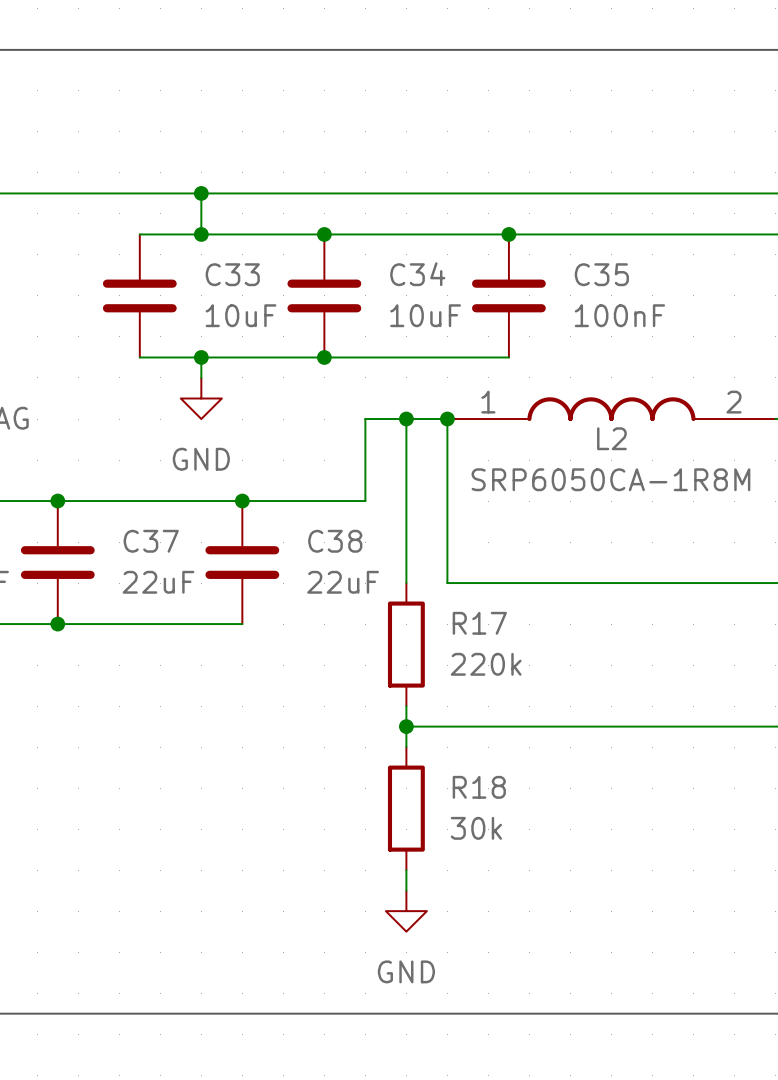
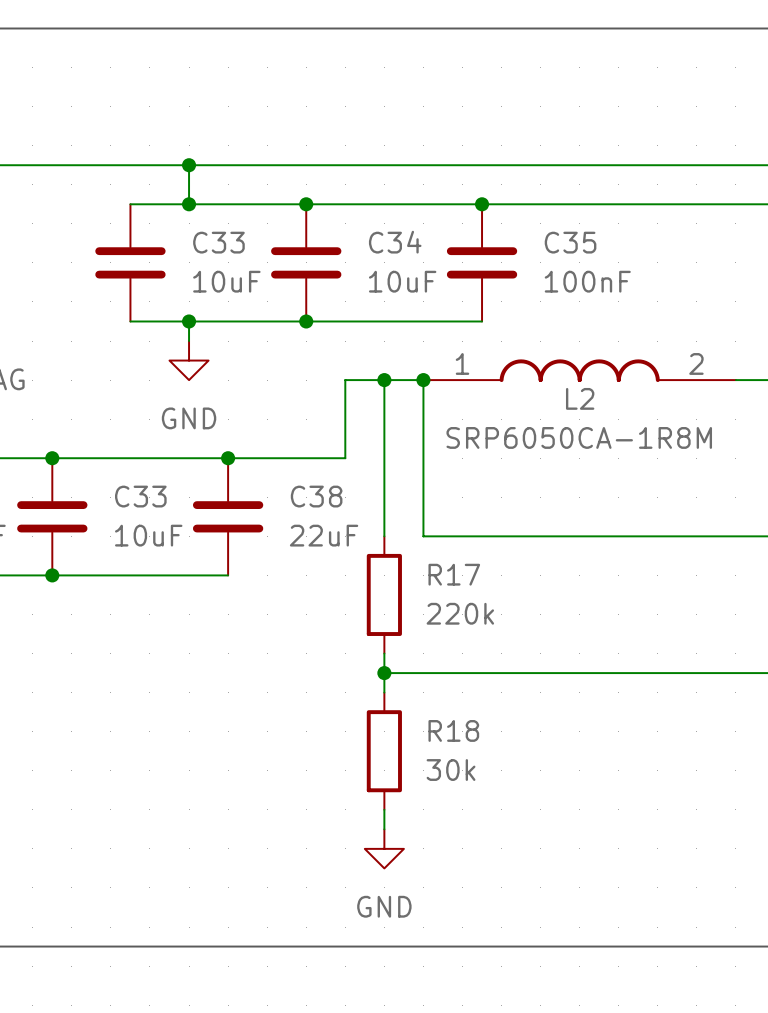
C37 name: C37 (151, 541) -> C33 (140, 496)
C37 value: 22uF (158, 582) -> 10uF (148, 535)

